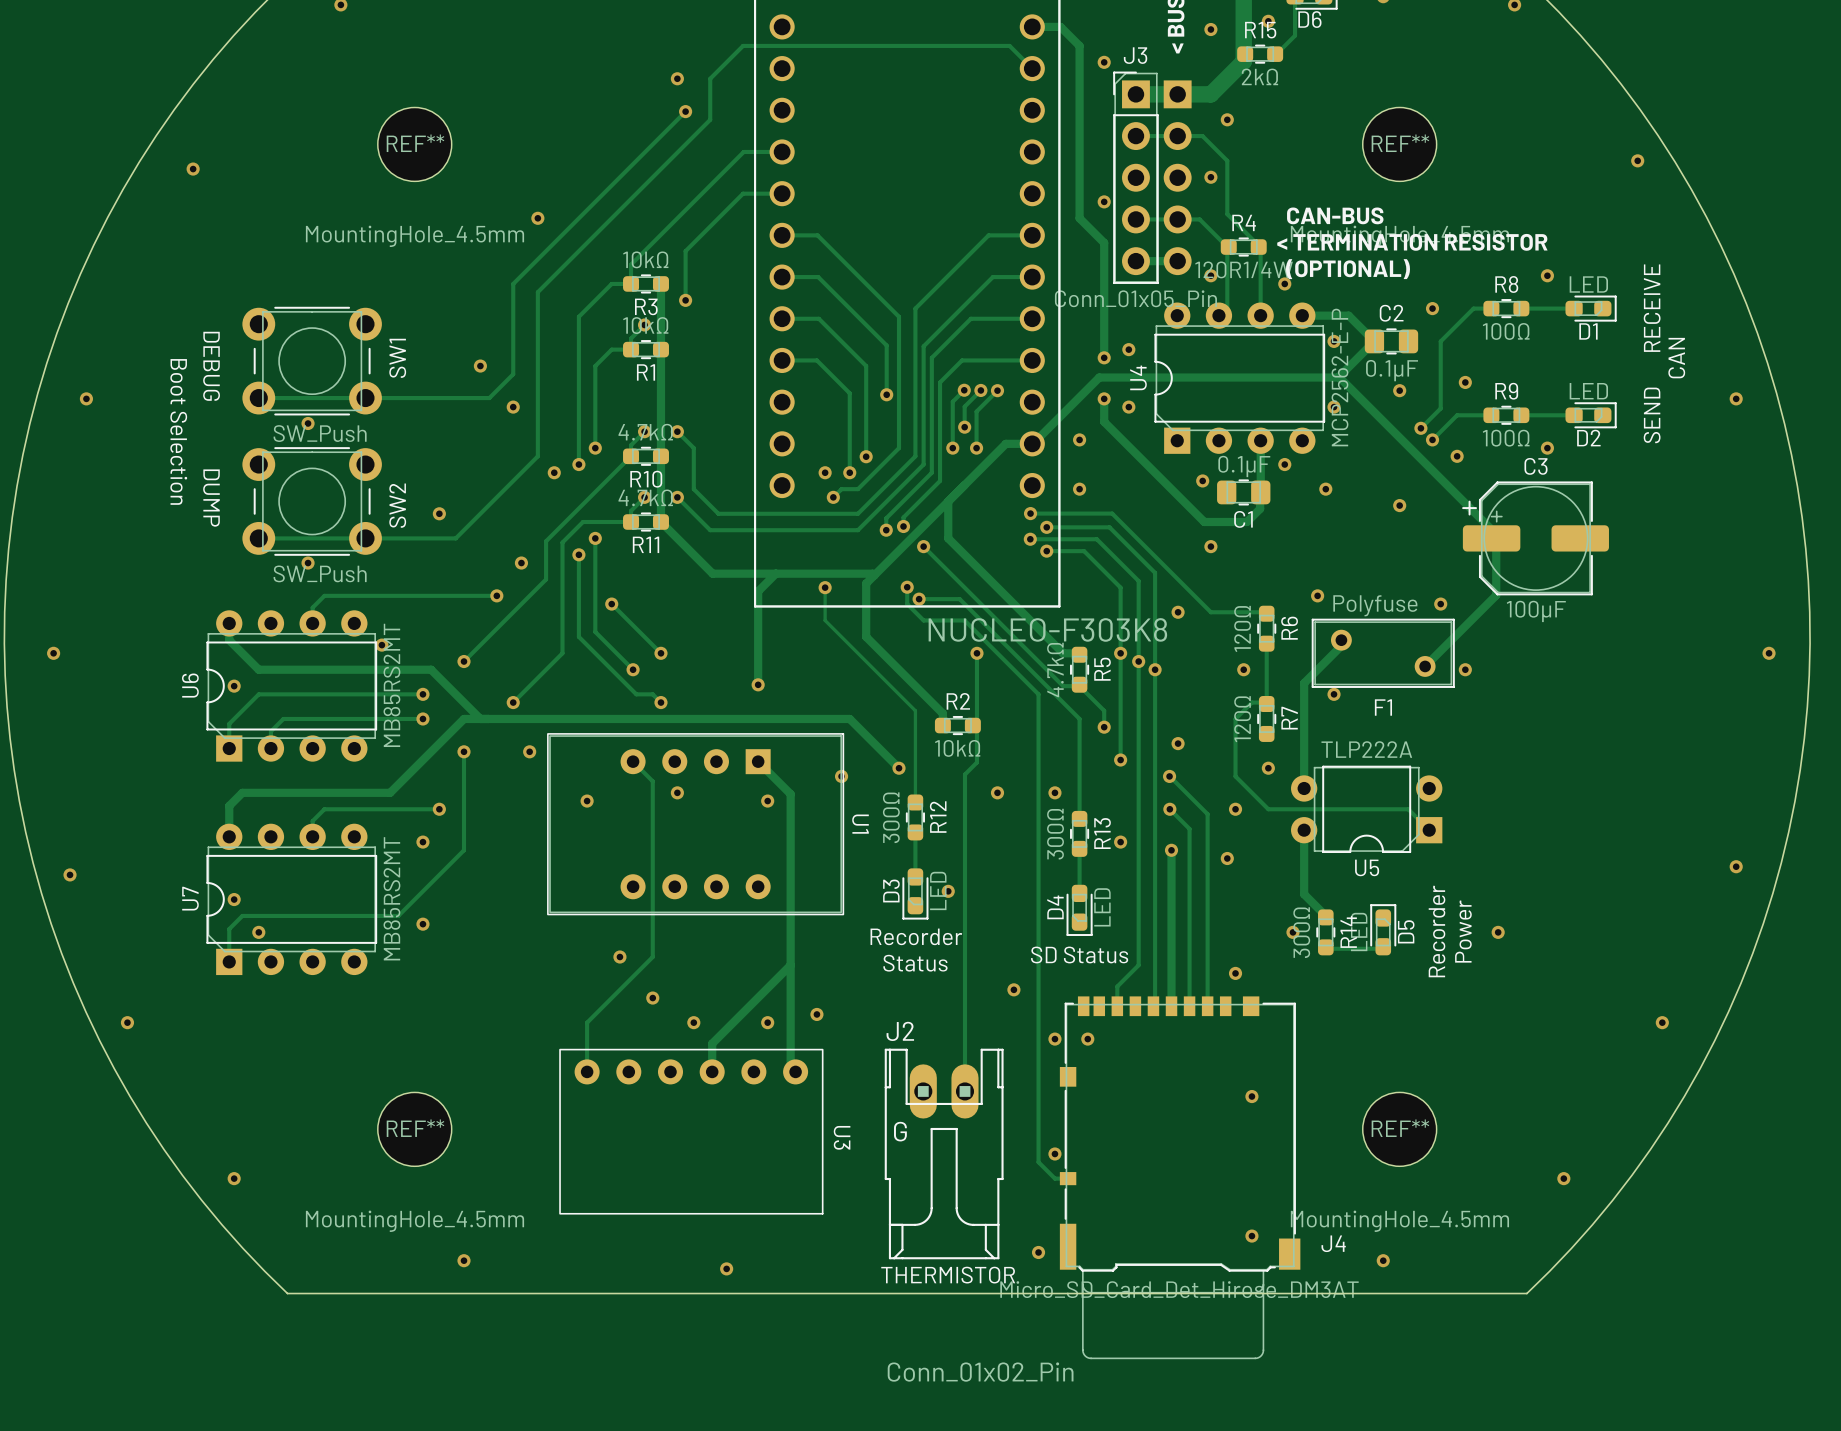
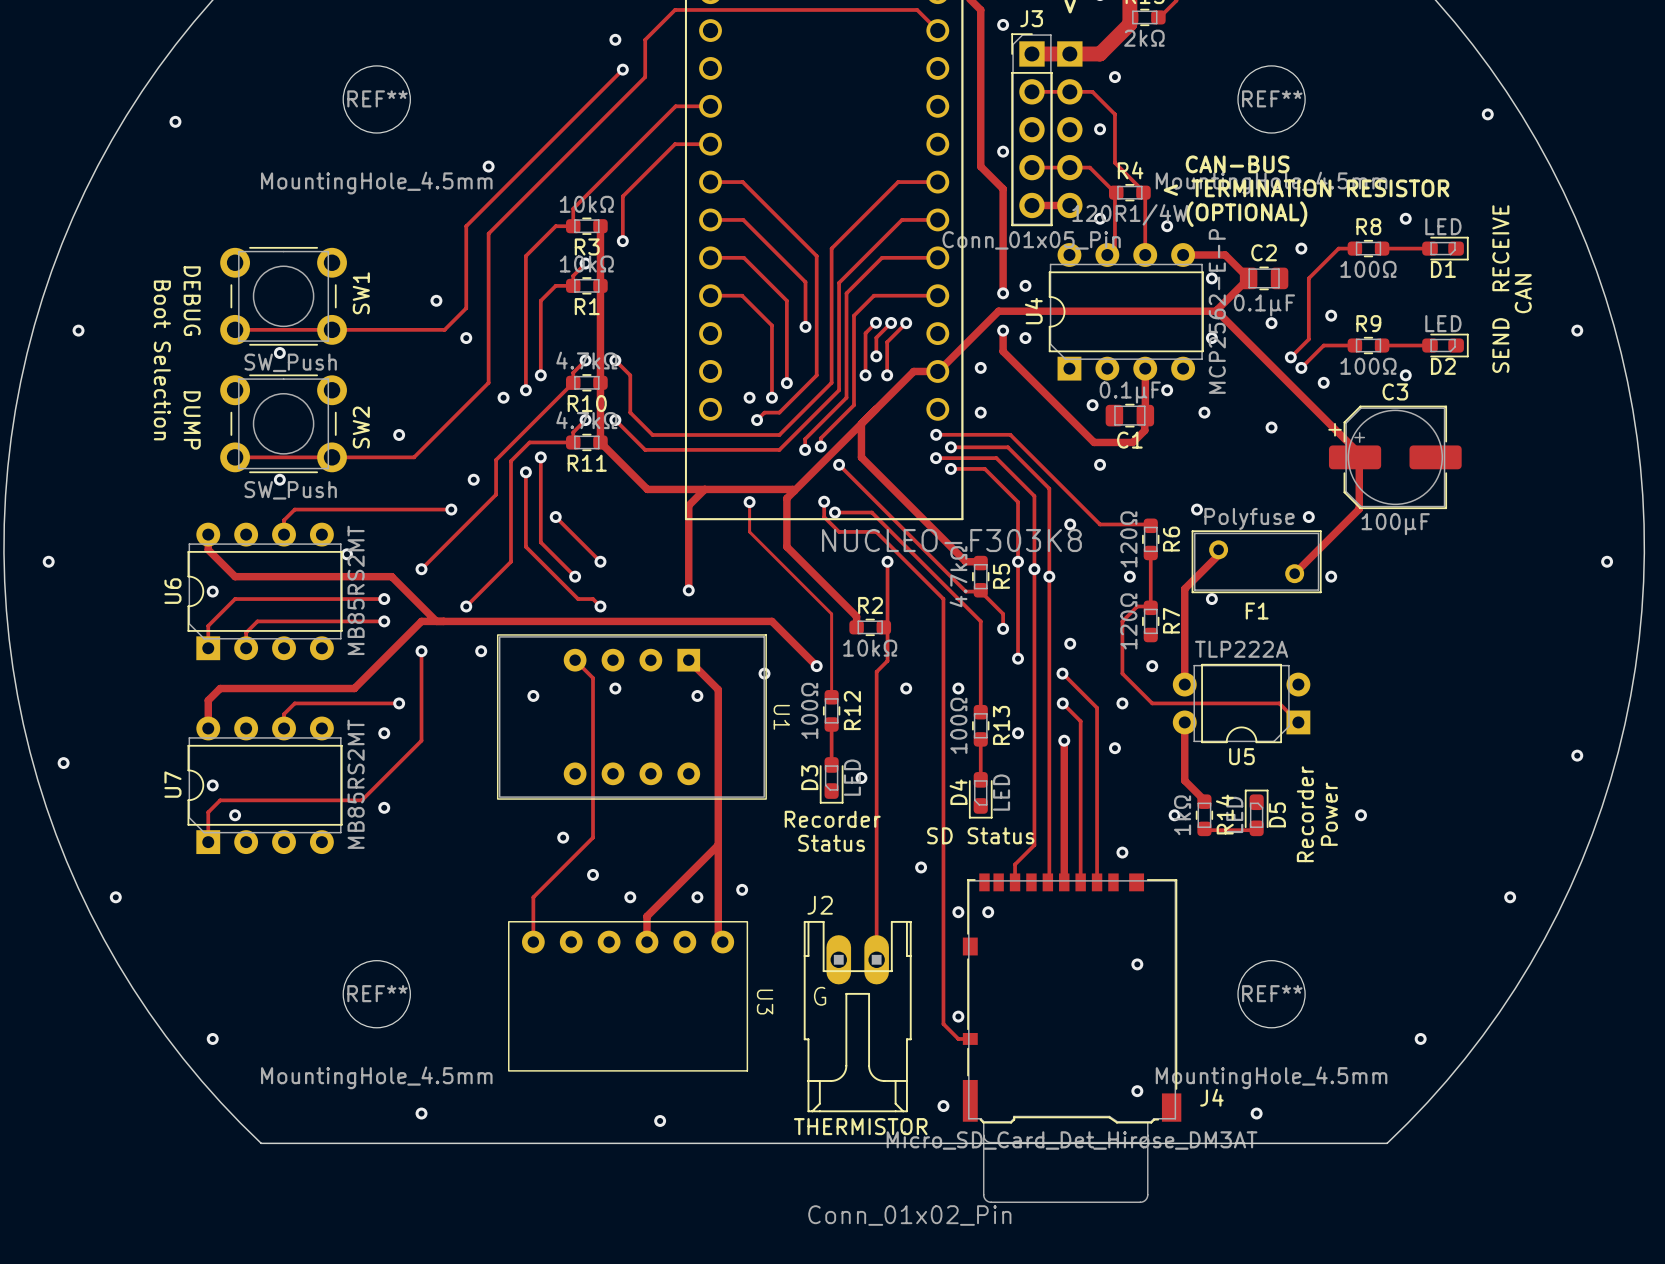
R12 value: 300Ω (891, 817) -> 100Ω (809, 710)
R13 value: 300Ω (1055, 834) -> 100Ω (958, 725)
R14 value: 300Ω (1301, 932) -> 1kΩ (1182, 815)

